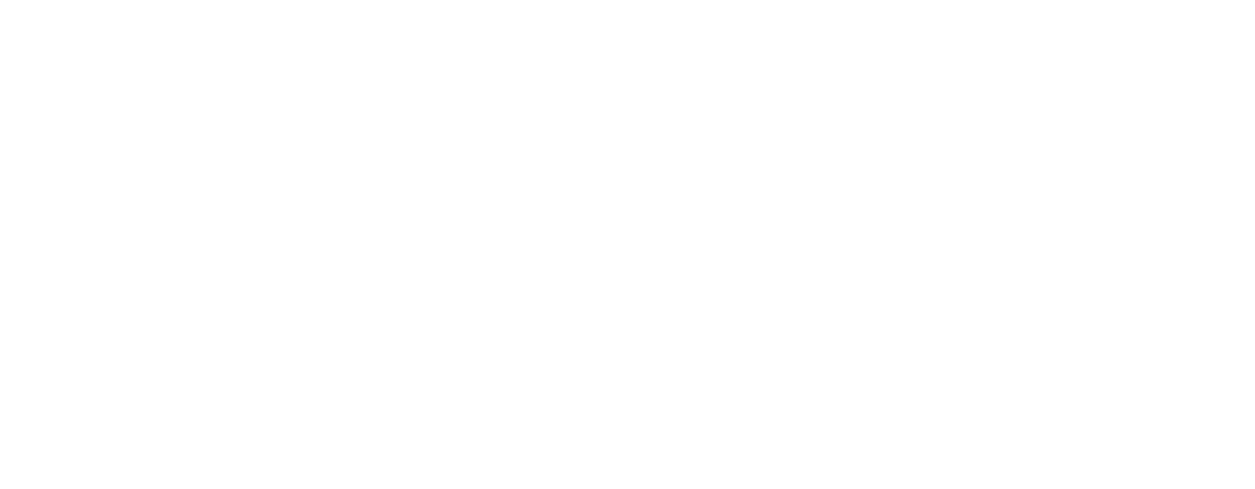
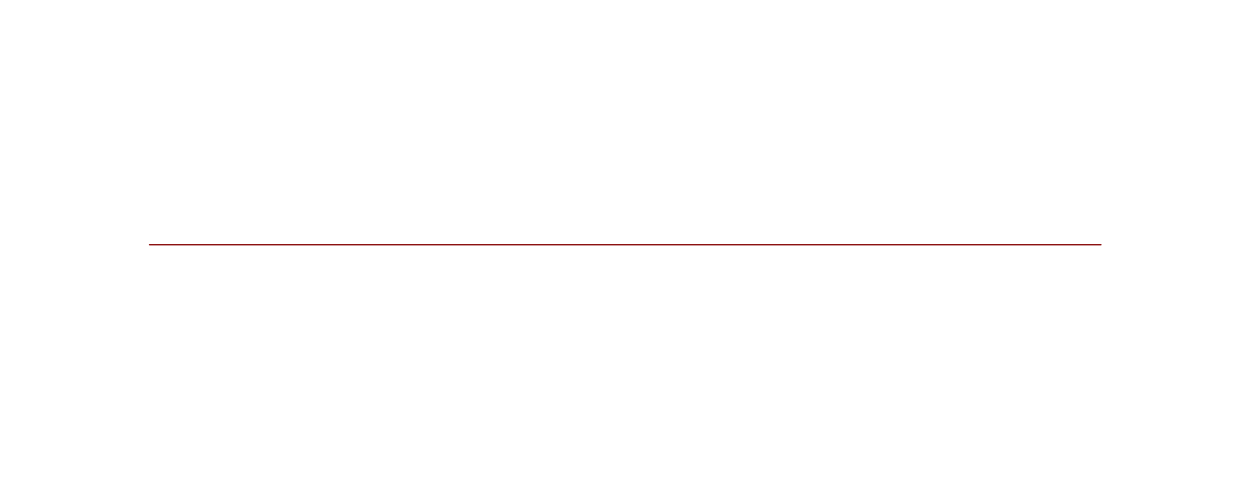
part: none -> (625, 244)

